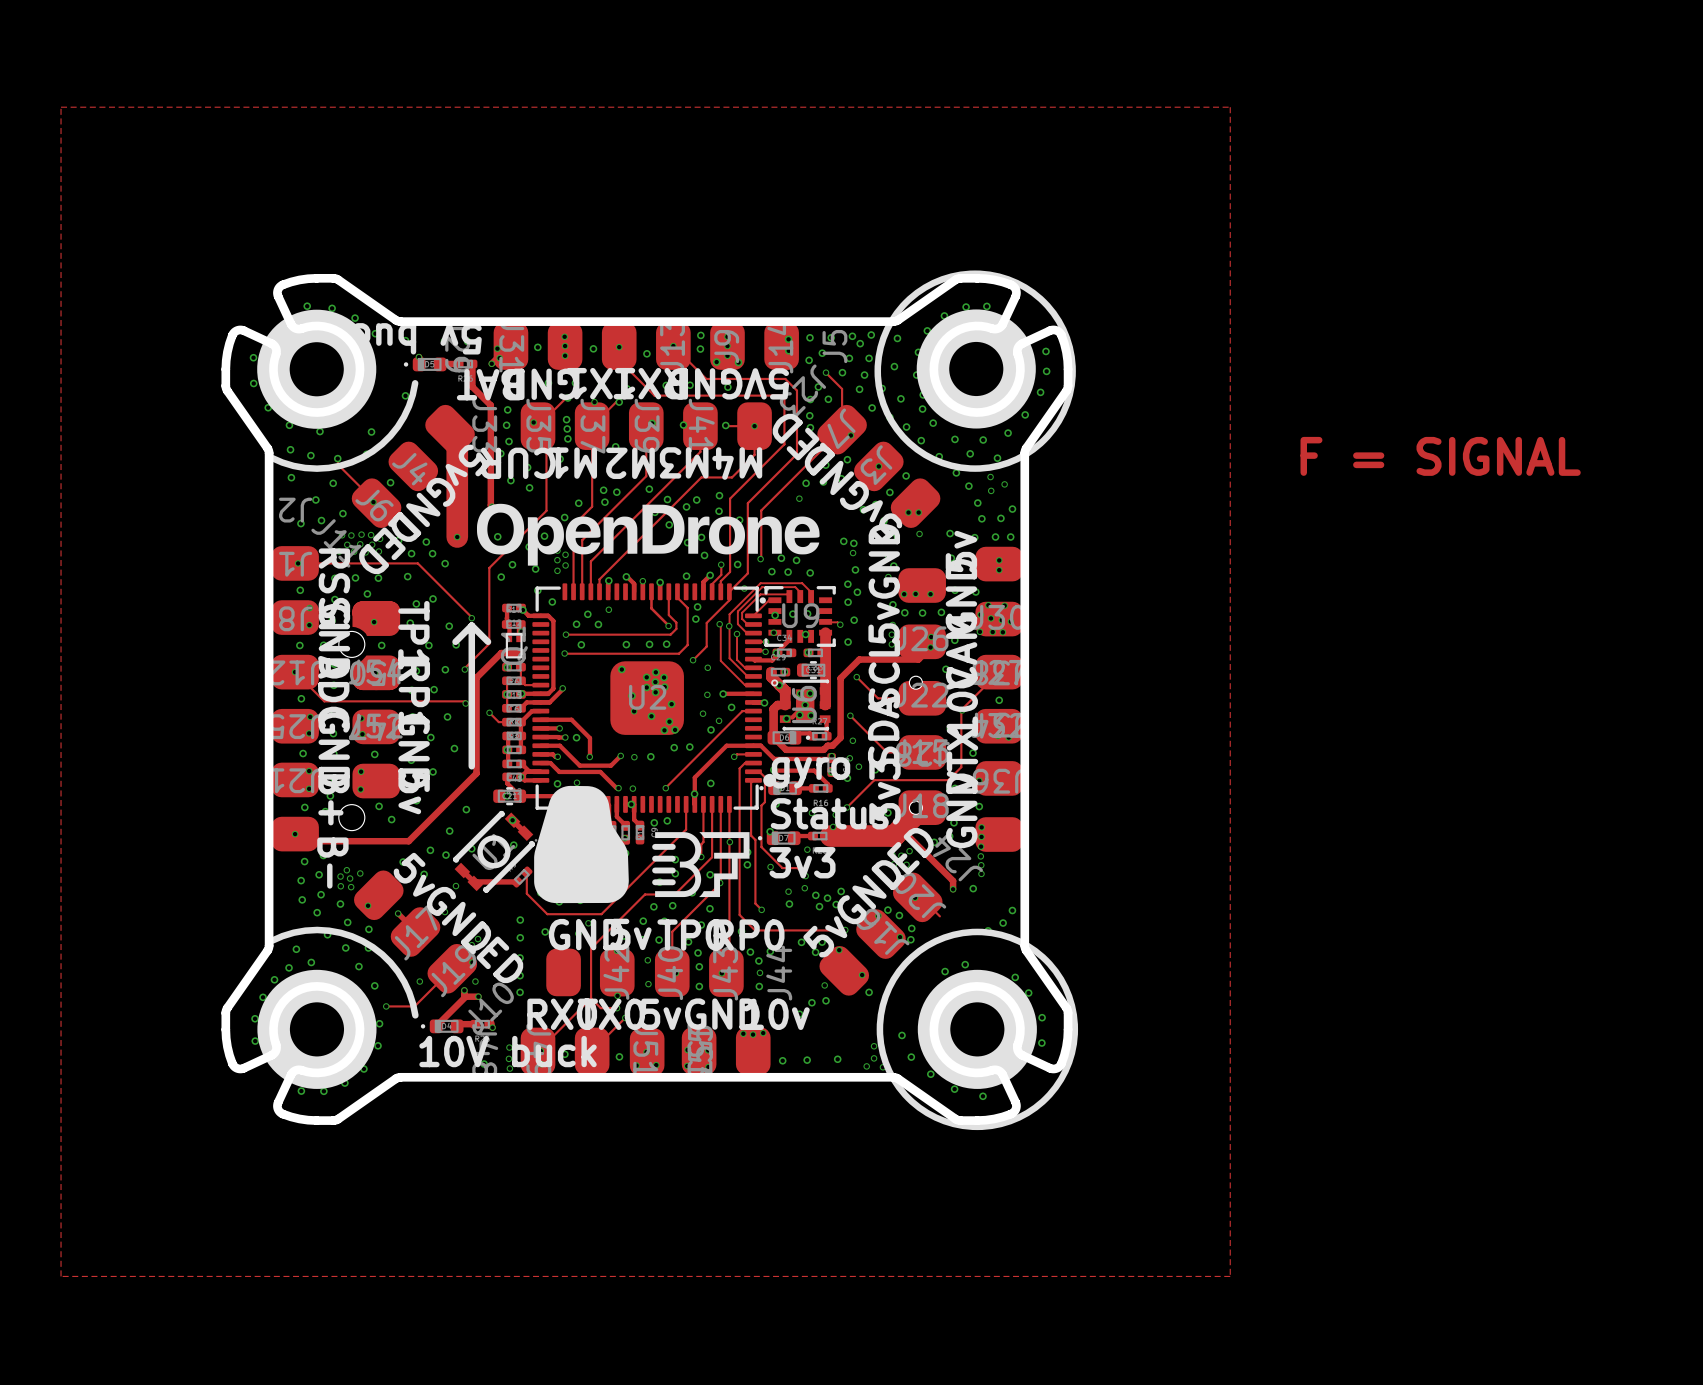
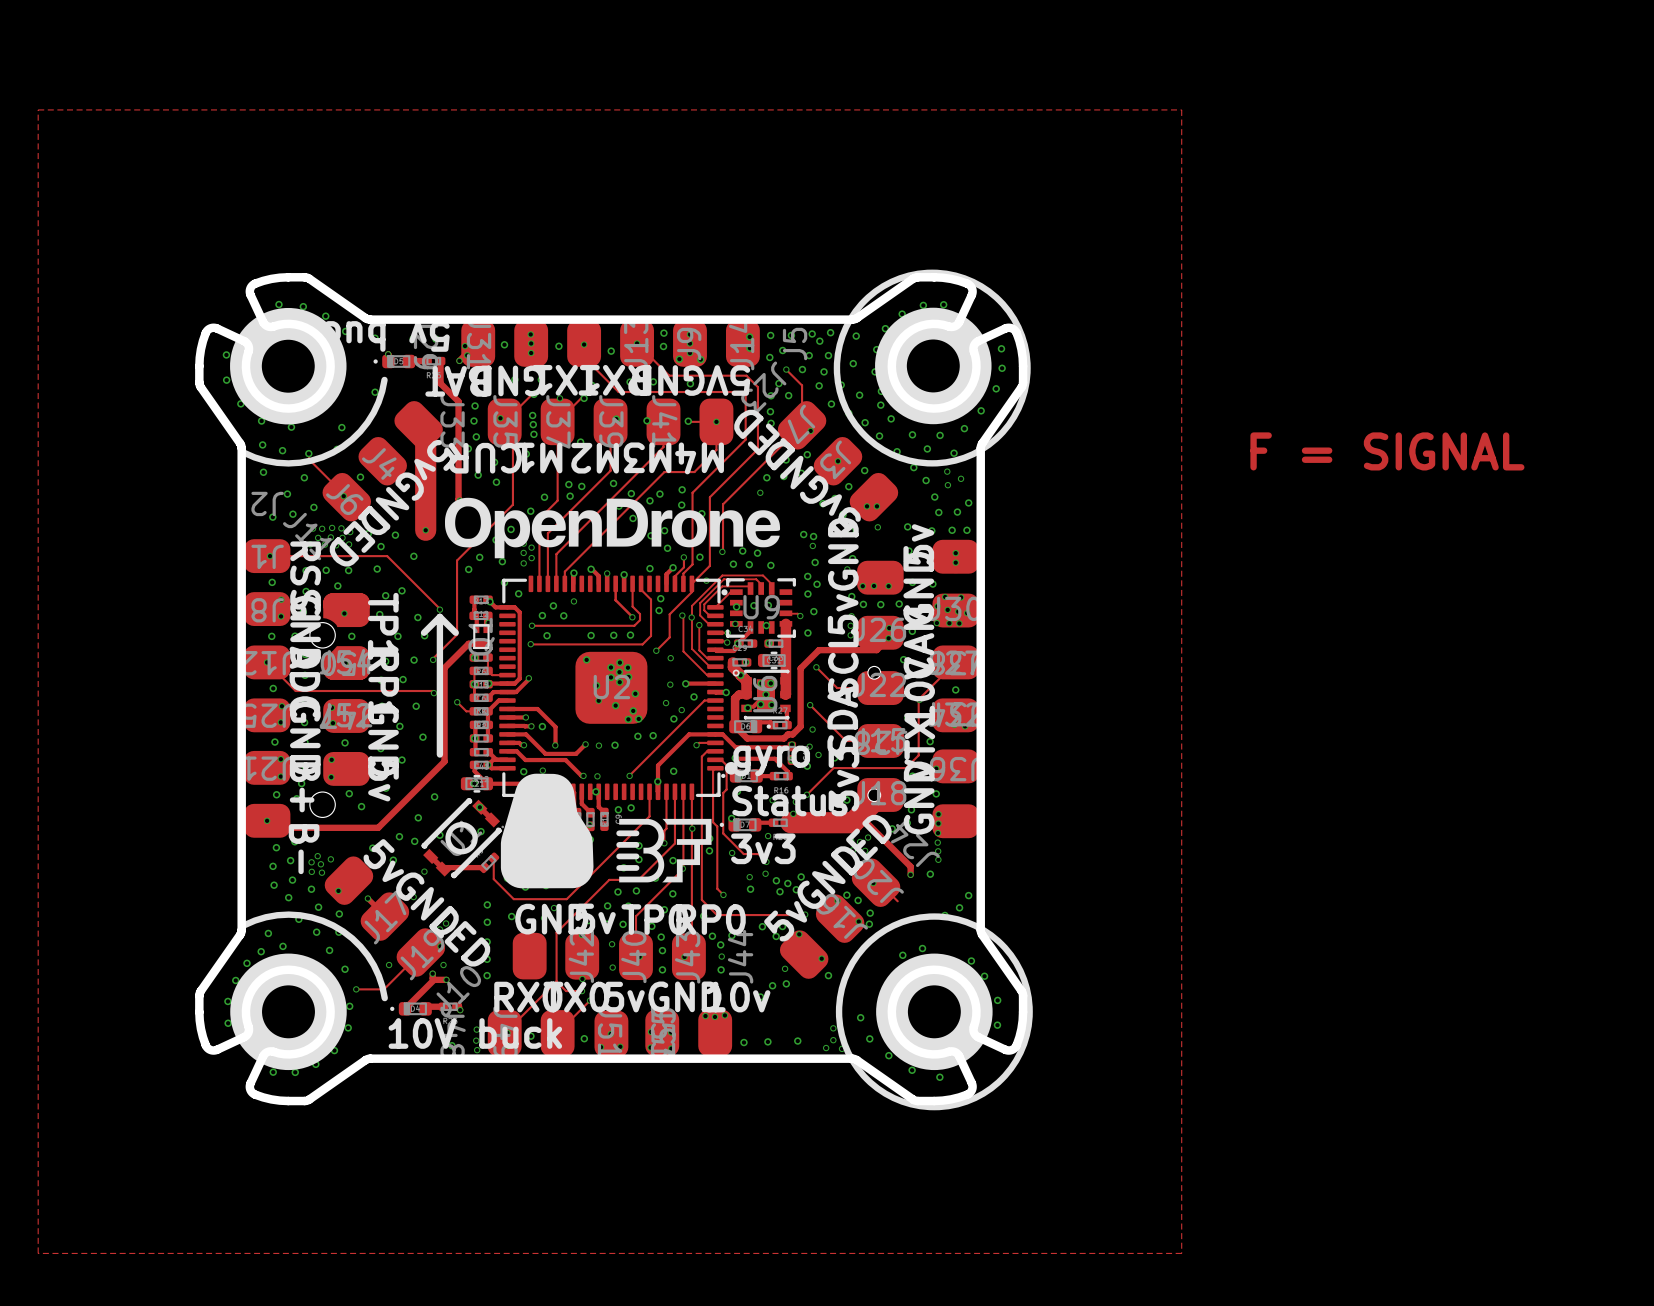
via: (497, 536) -> none
via: (432, 553) -> none

